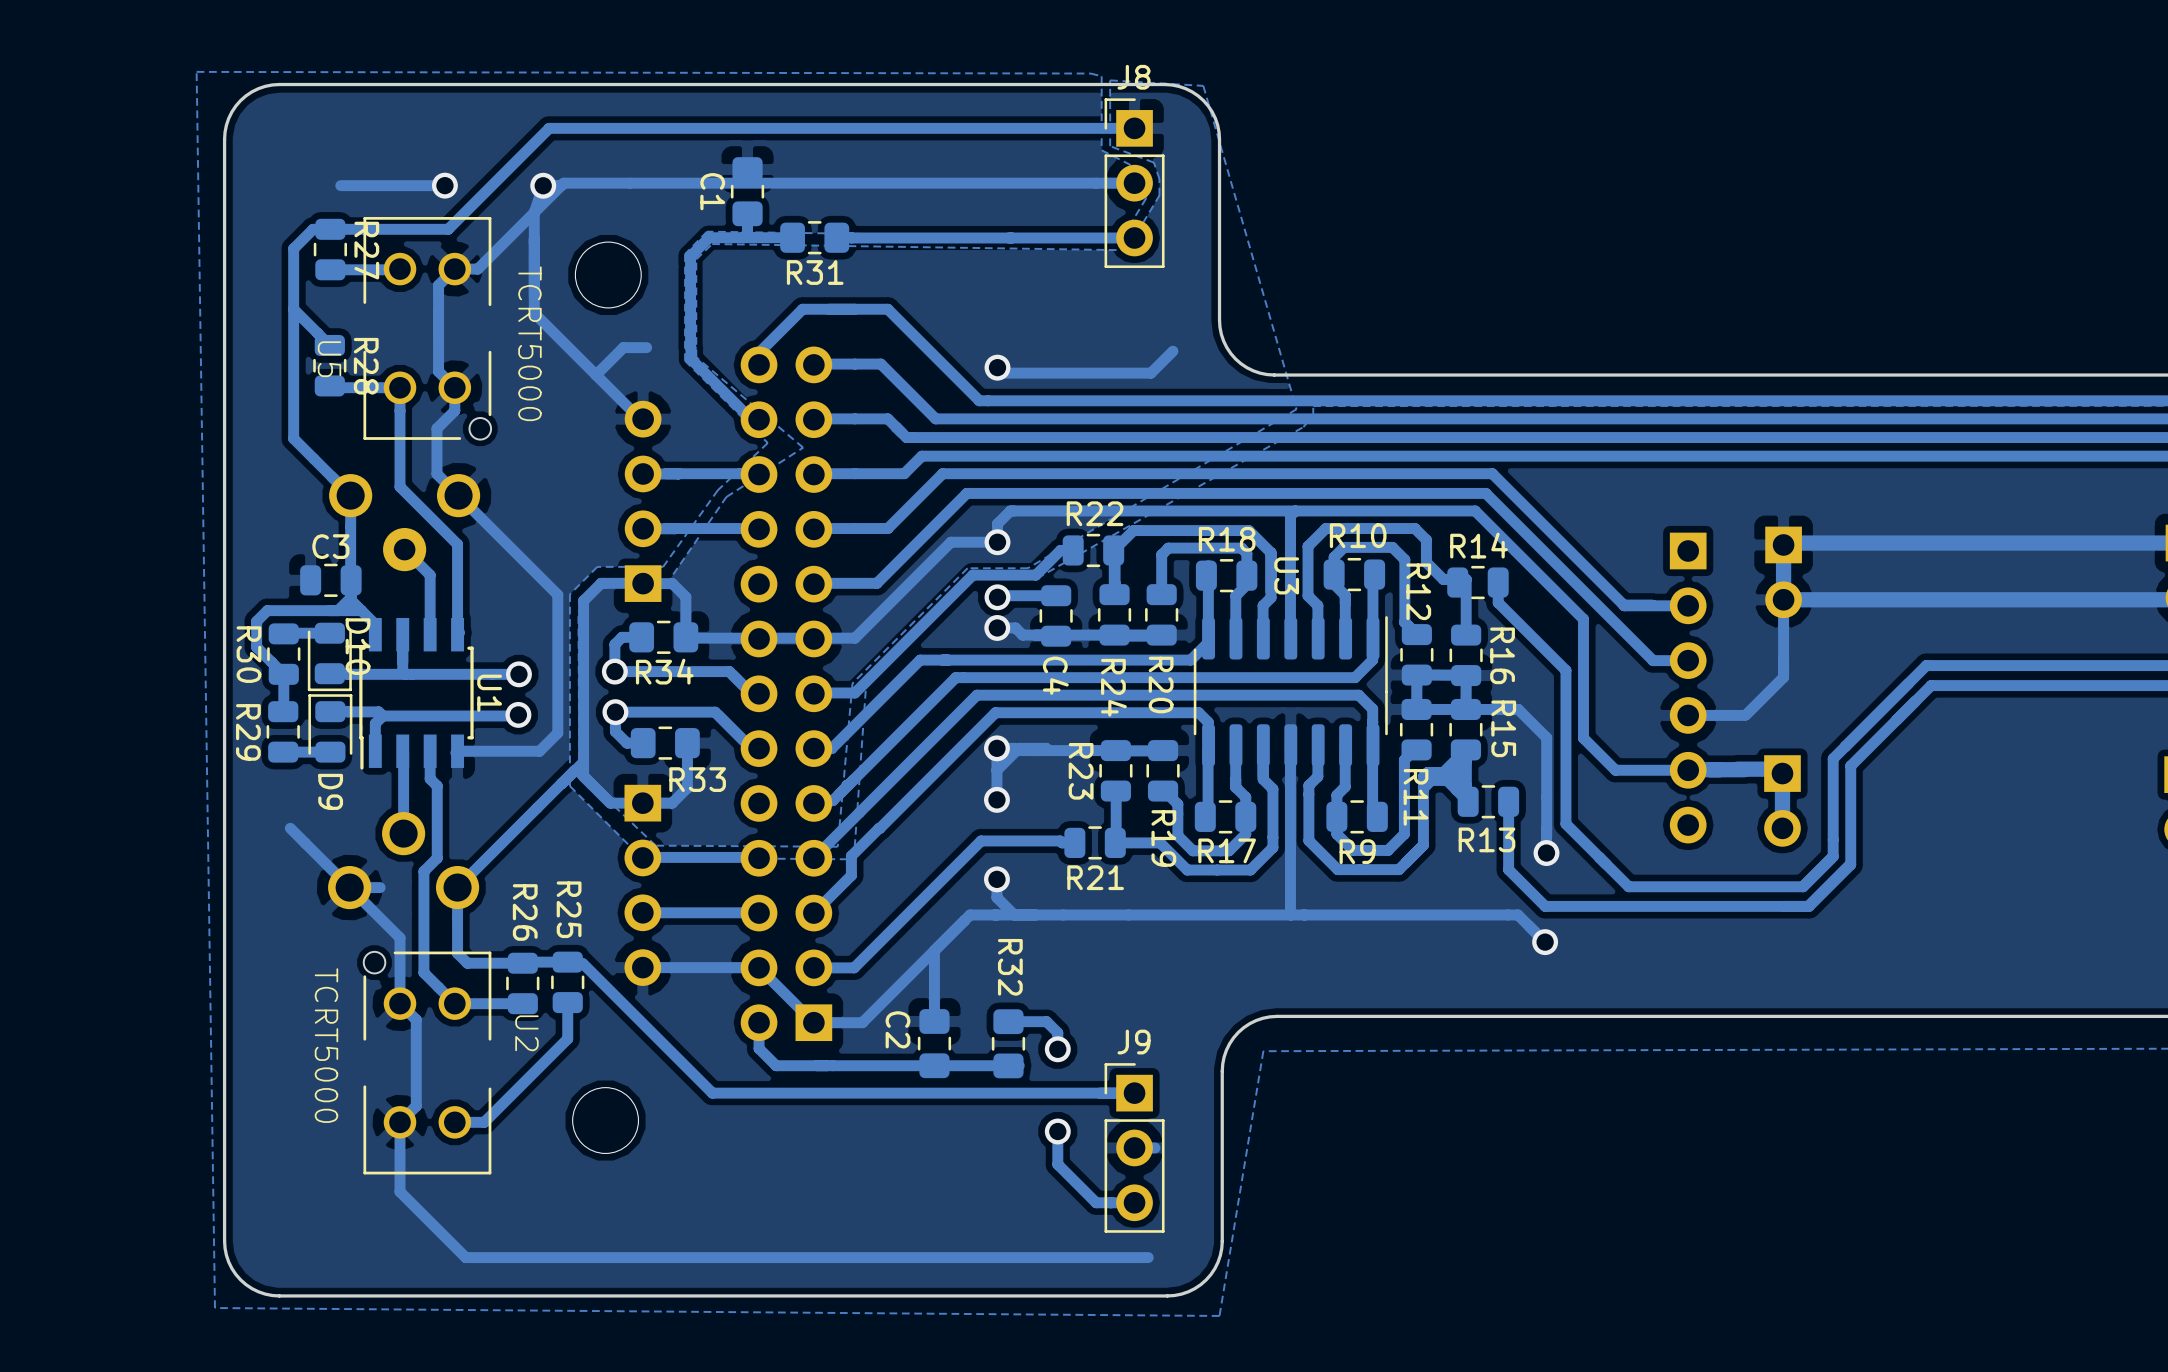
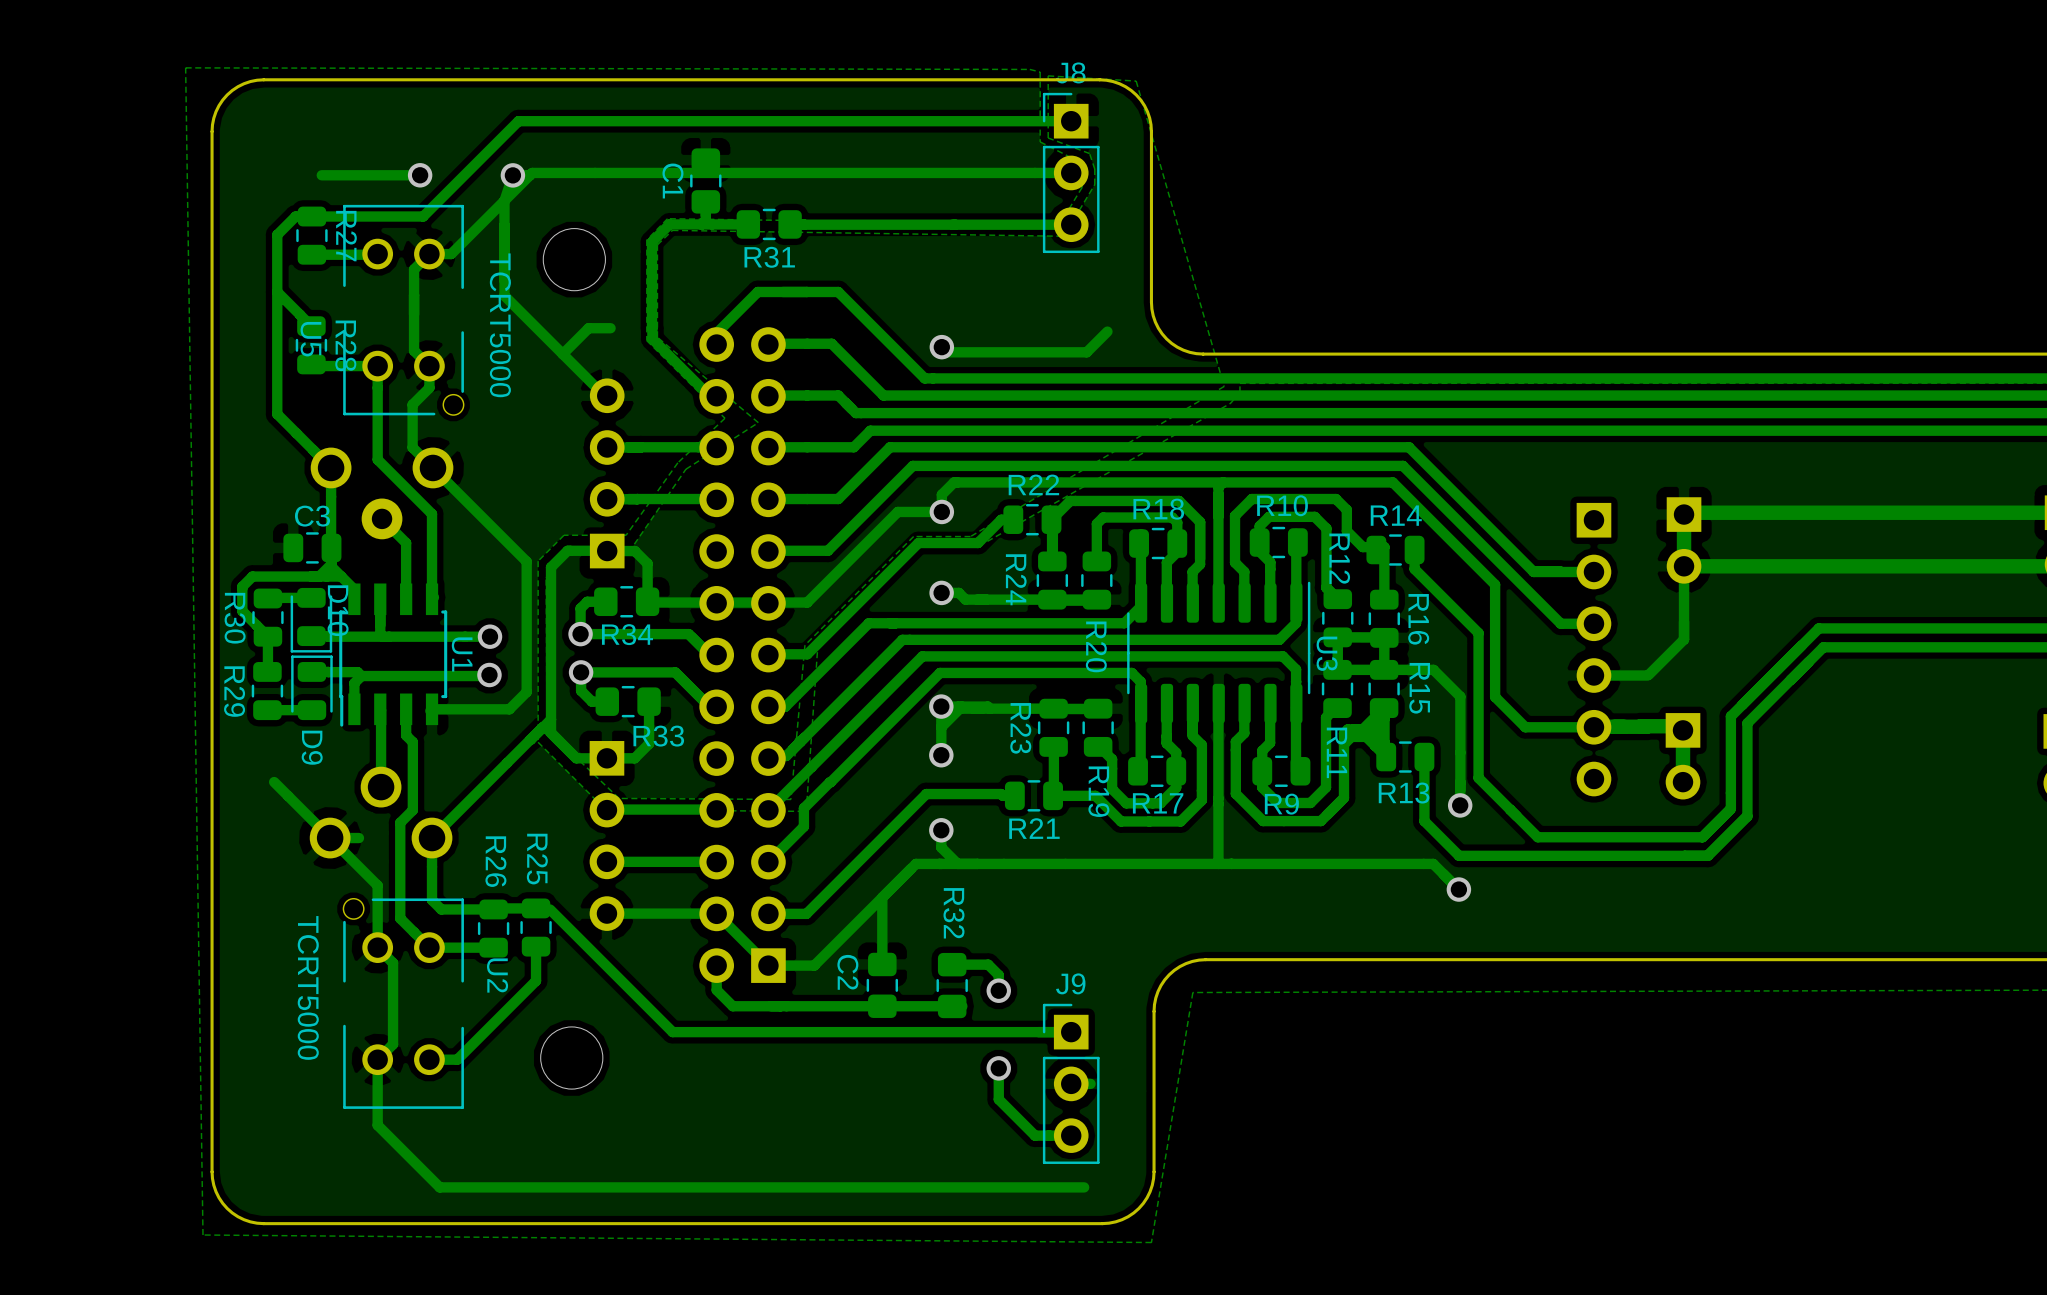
U3 name position: U3 (1286, 575) -> U3 (1327, 653)
track: (1056, 595) (999, 595) (997, 597) -> none
via: (997, 597) -> none
C4: (1056, 615) -> none
R24 name position: R24 (1113, 687) -> R24 (1016, 579)

